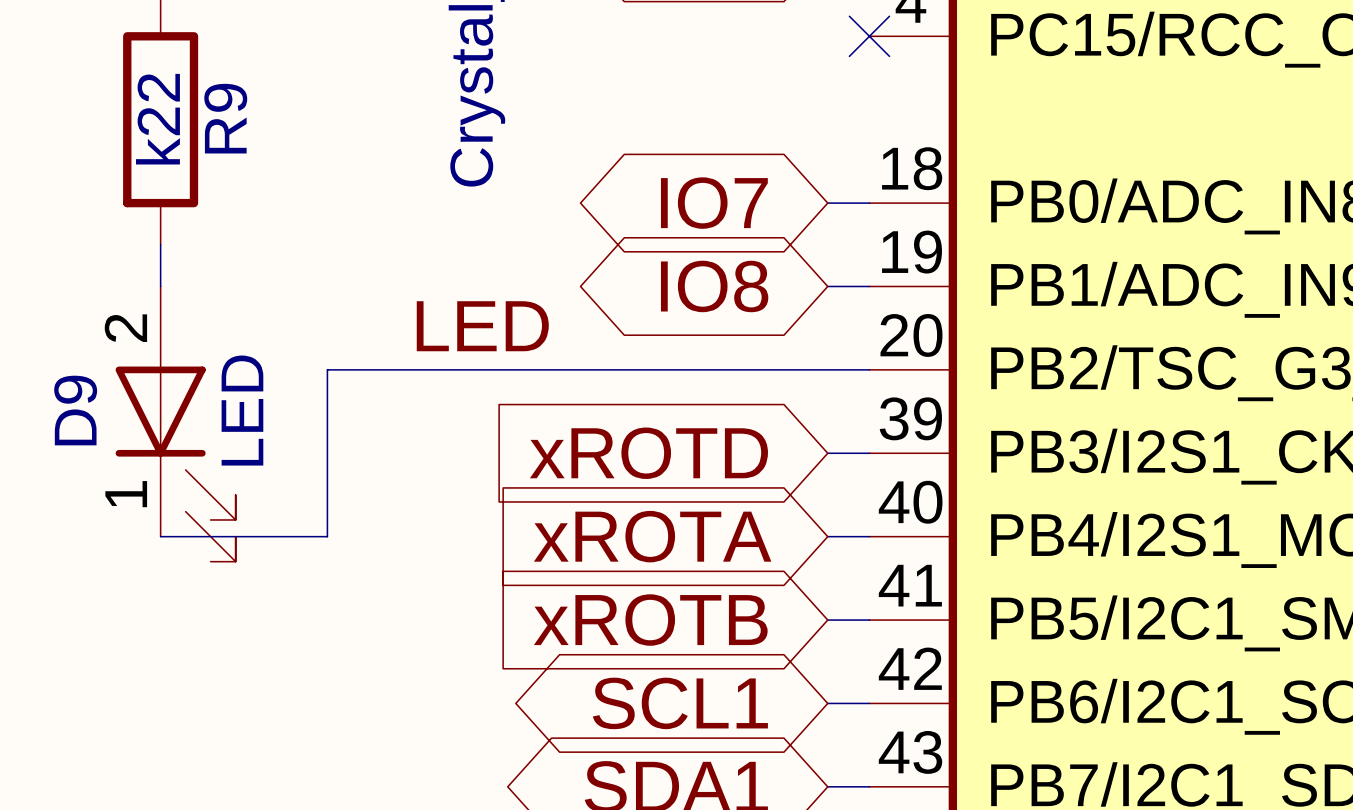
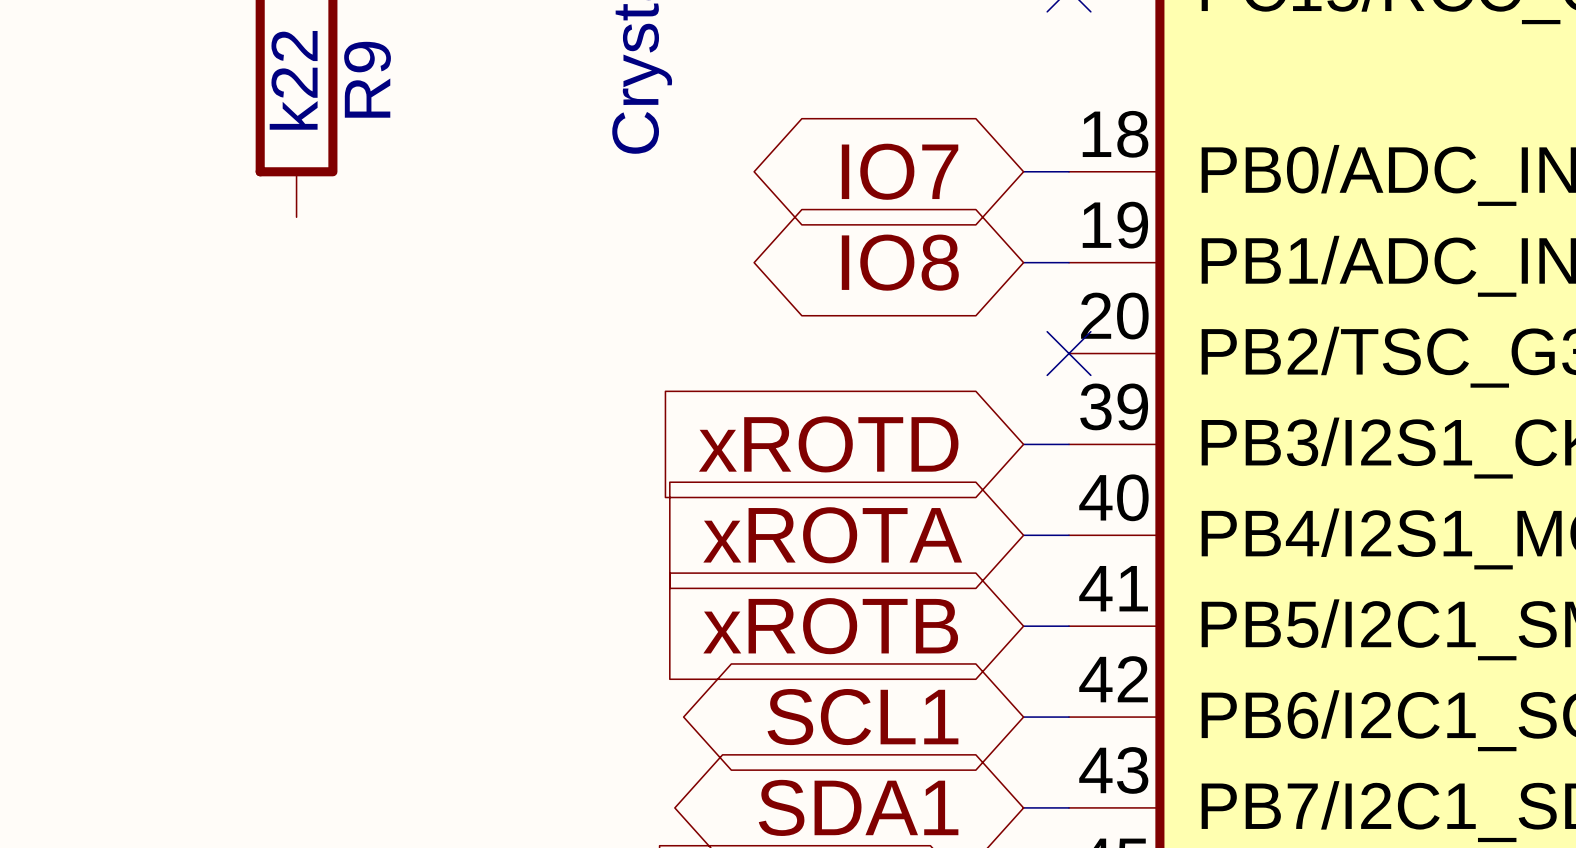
wire: (160, 244) (160, 286) -> none
label: LED (482, 326) -> none
wire: (869, 369) (327, 369) (327, 536) (160, 536) -> none
no-connect mark: none -> (1069, 353)
D9: LED (175, 424) -> none

